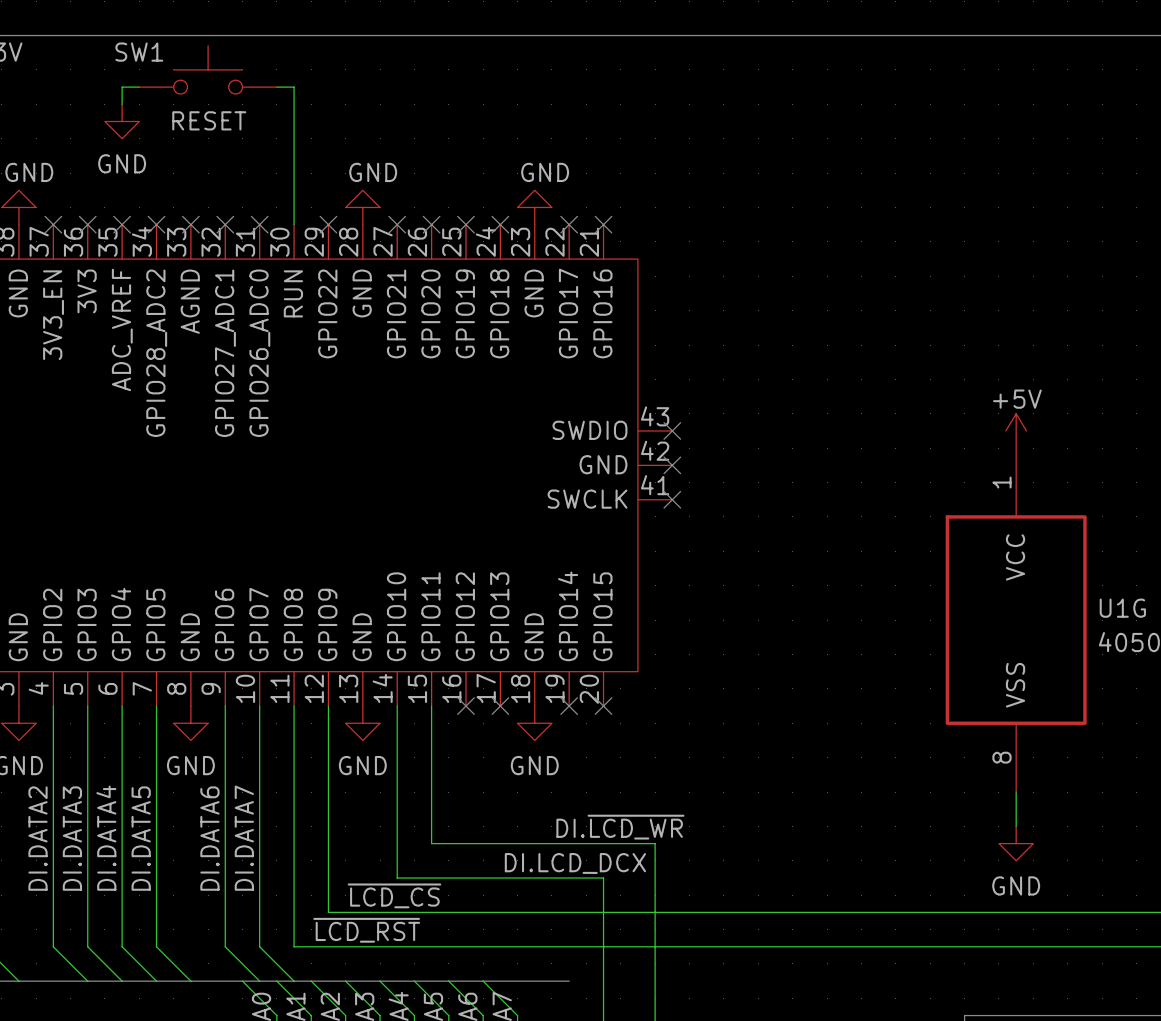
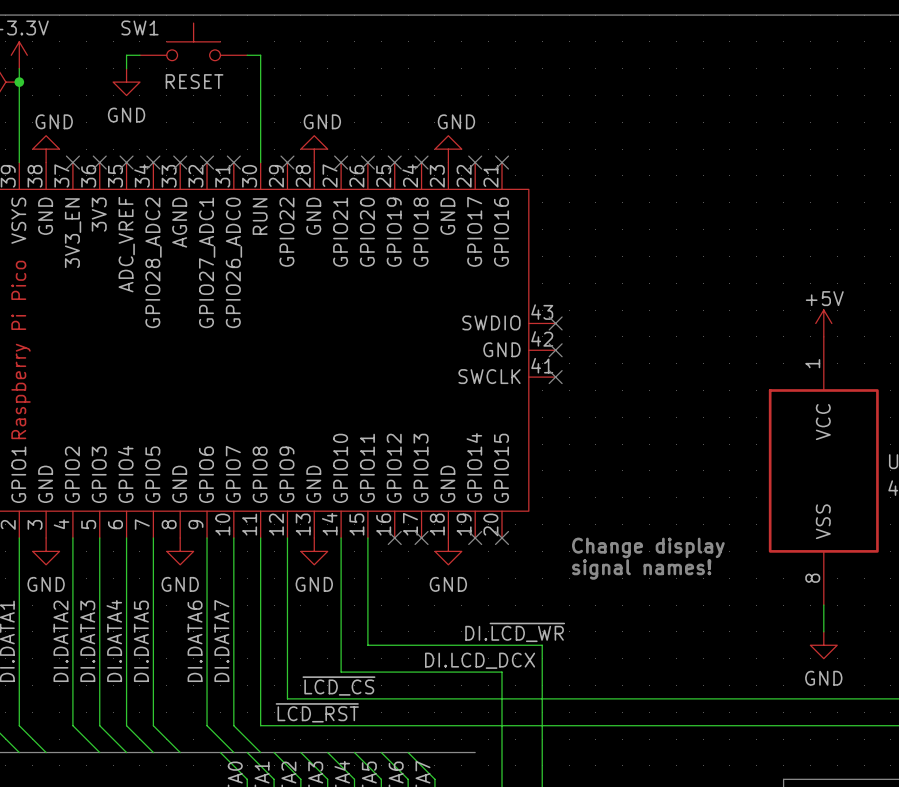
text: none -> Change display (648, 547)
text: none -> signal names! (641, 569)

